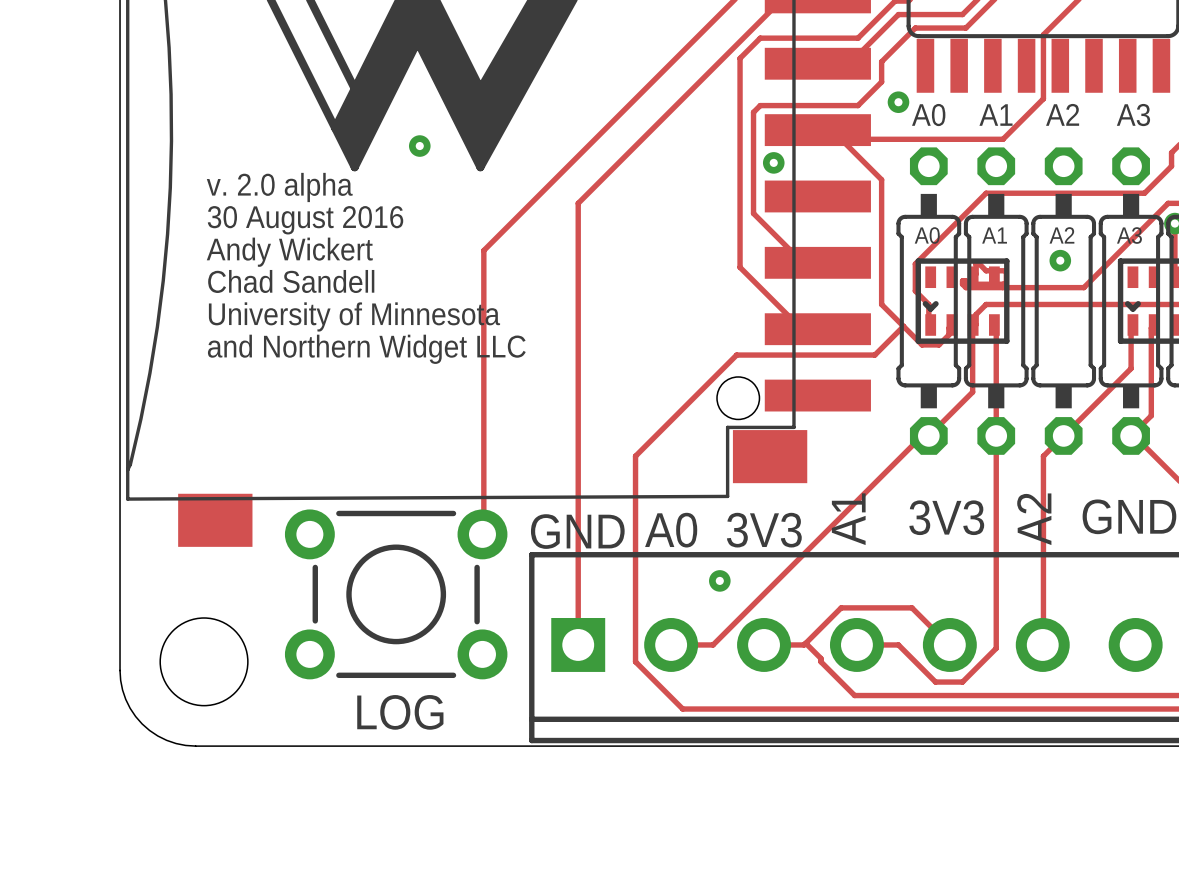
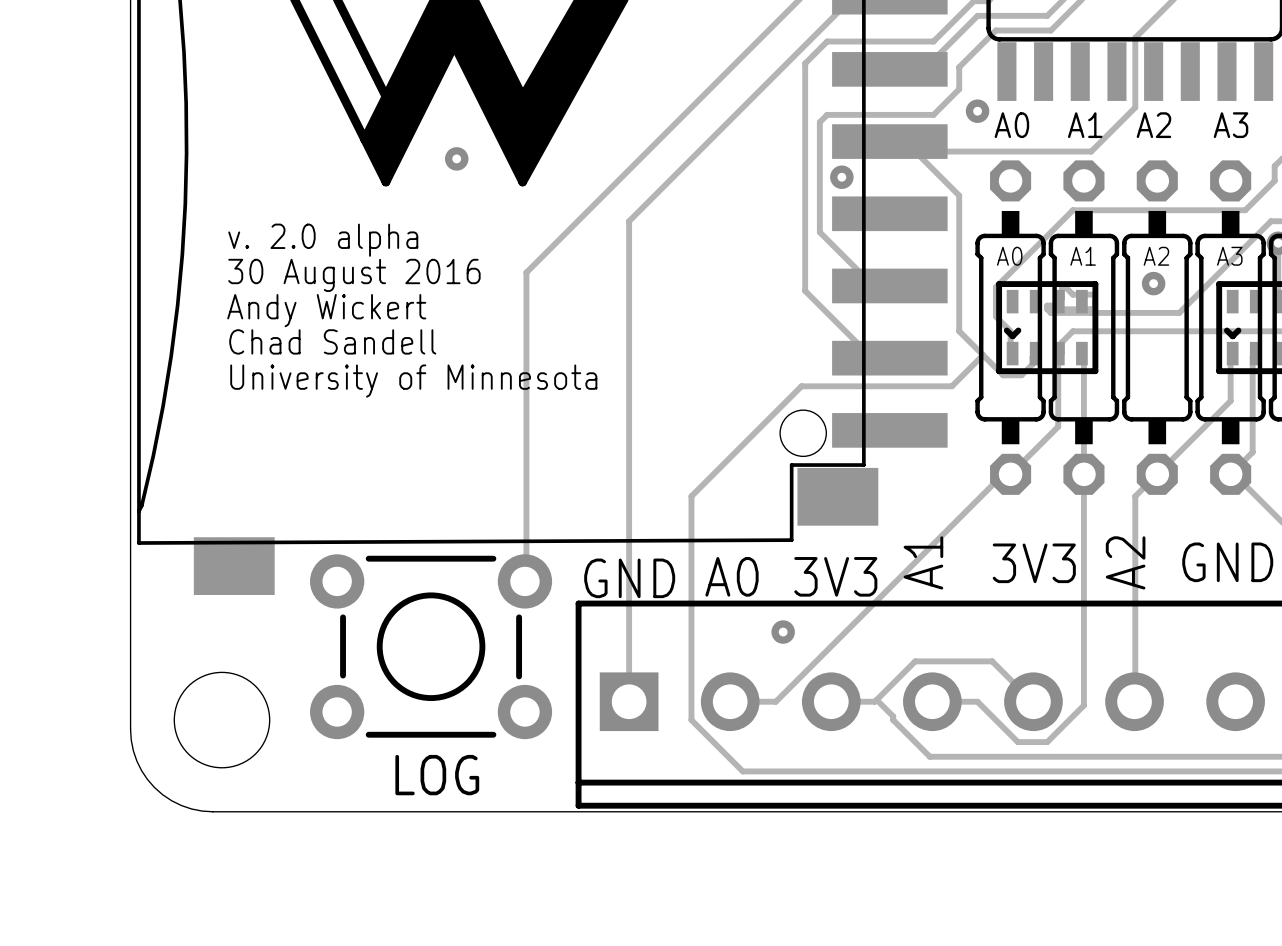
text: v. 2.0 alpha (279, 187) -> none
text: 30 August 2016 (305, 220) -> v. 2.0 alpha (323, 240)
text: Andy Wickert (289, 252) -> 30 August 2016 (354, 275)
text: Chad Sandell (291, 281) -> Andy Wickert (326, 310)
text: University of Minnesota (354, 316) -> Chad Sandell (332, 341)
text: and Northern Widget LLC (366, 349) -> University of Minnesota (413, 381)

